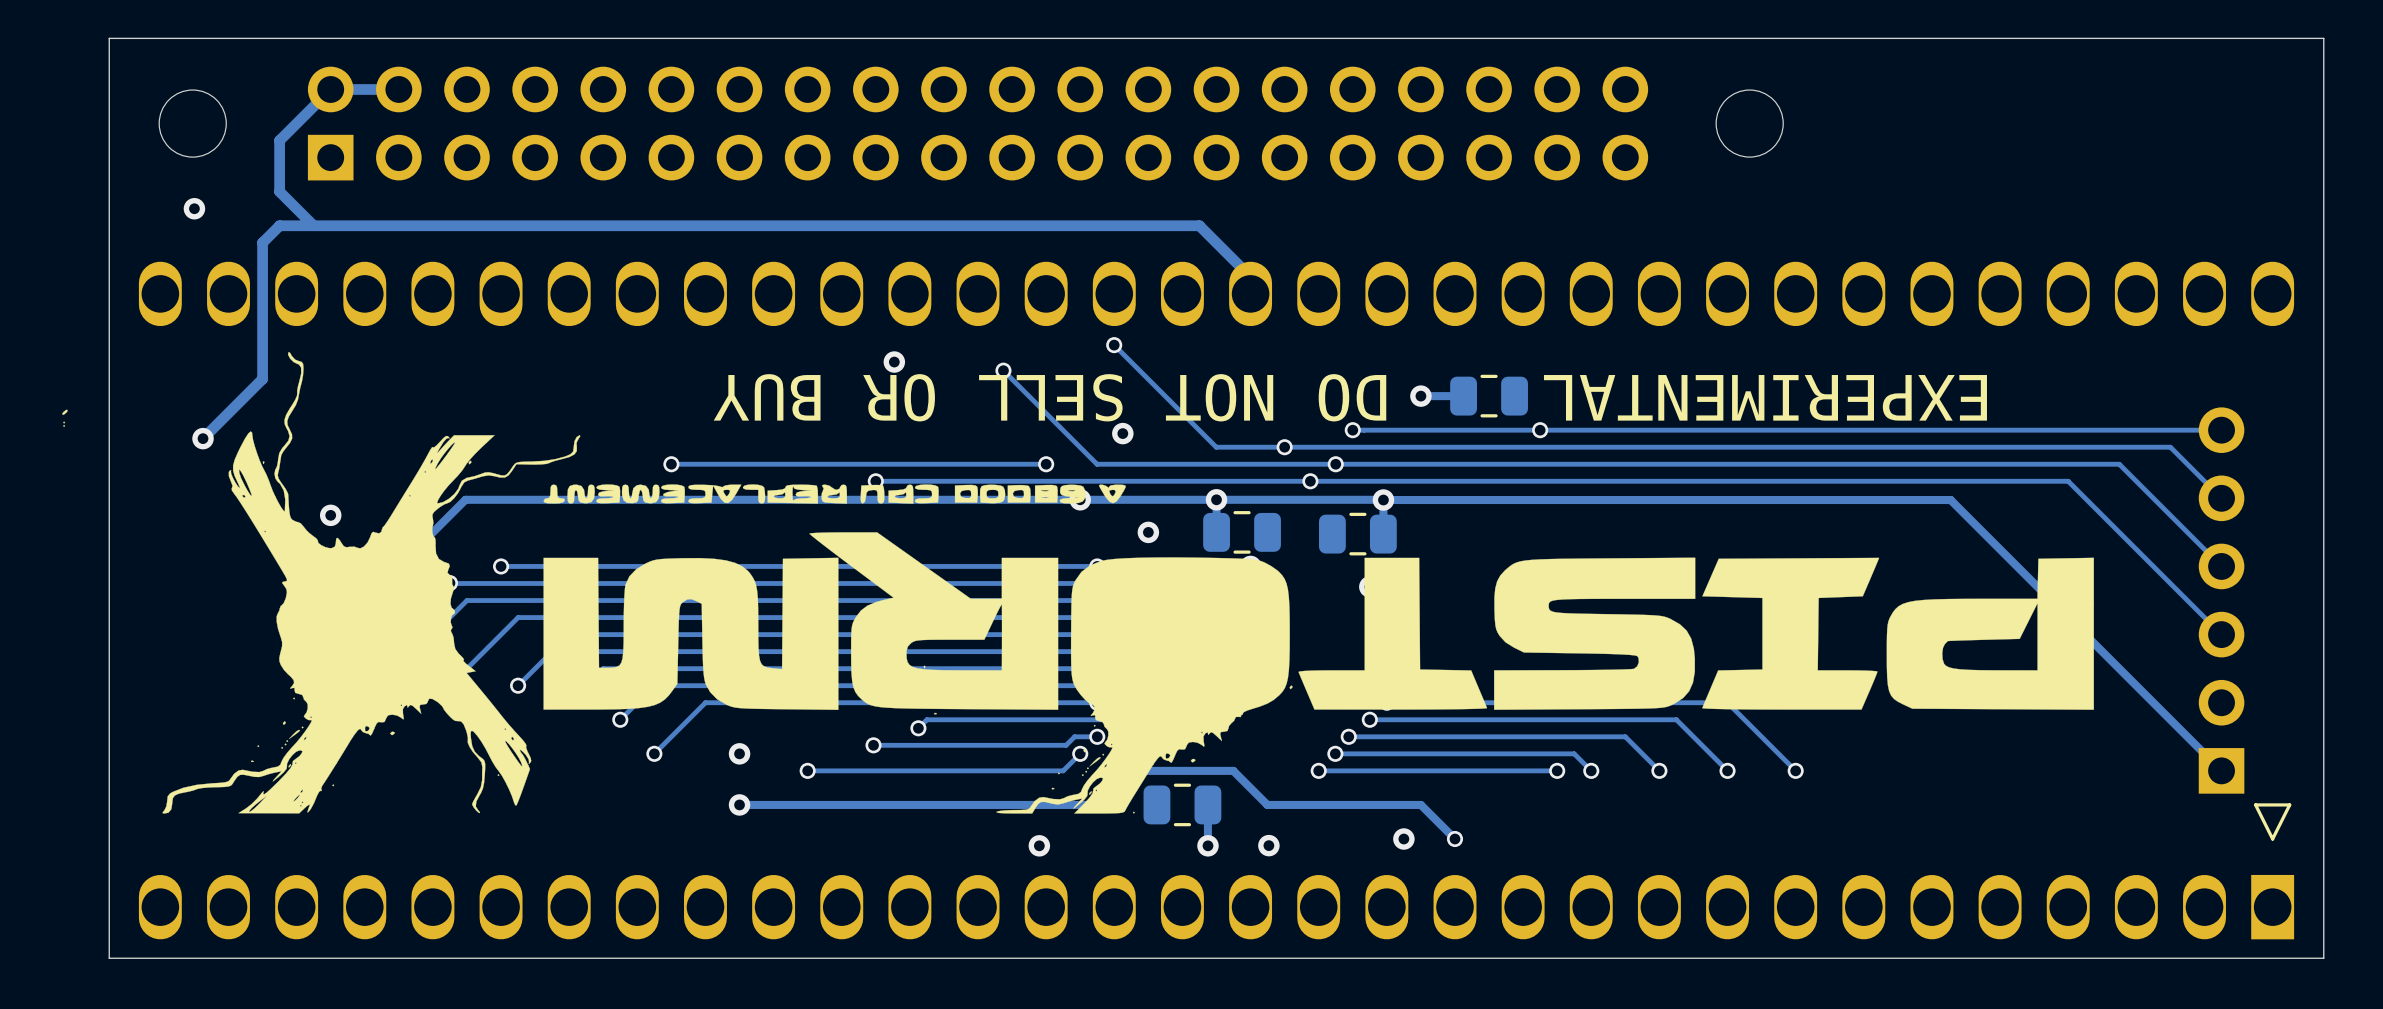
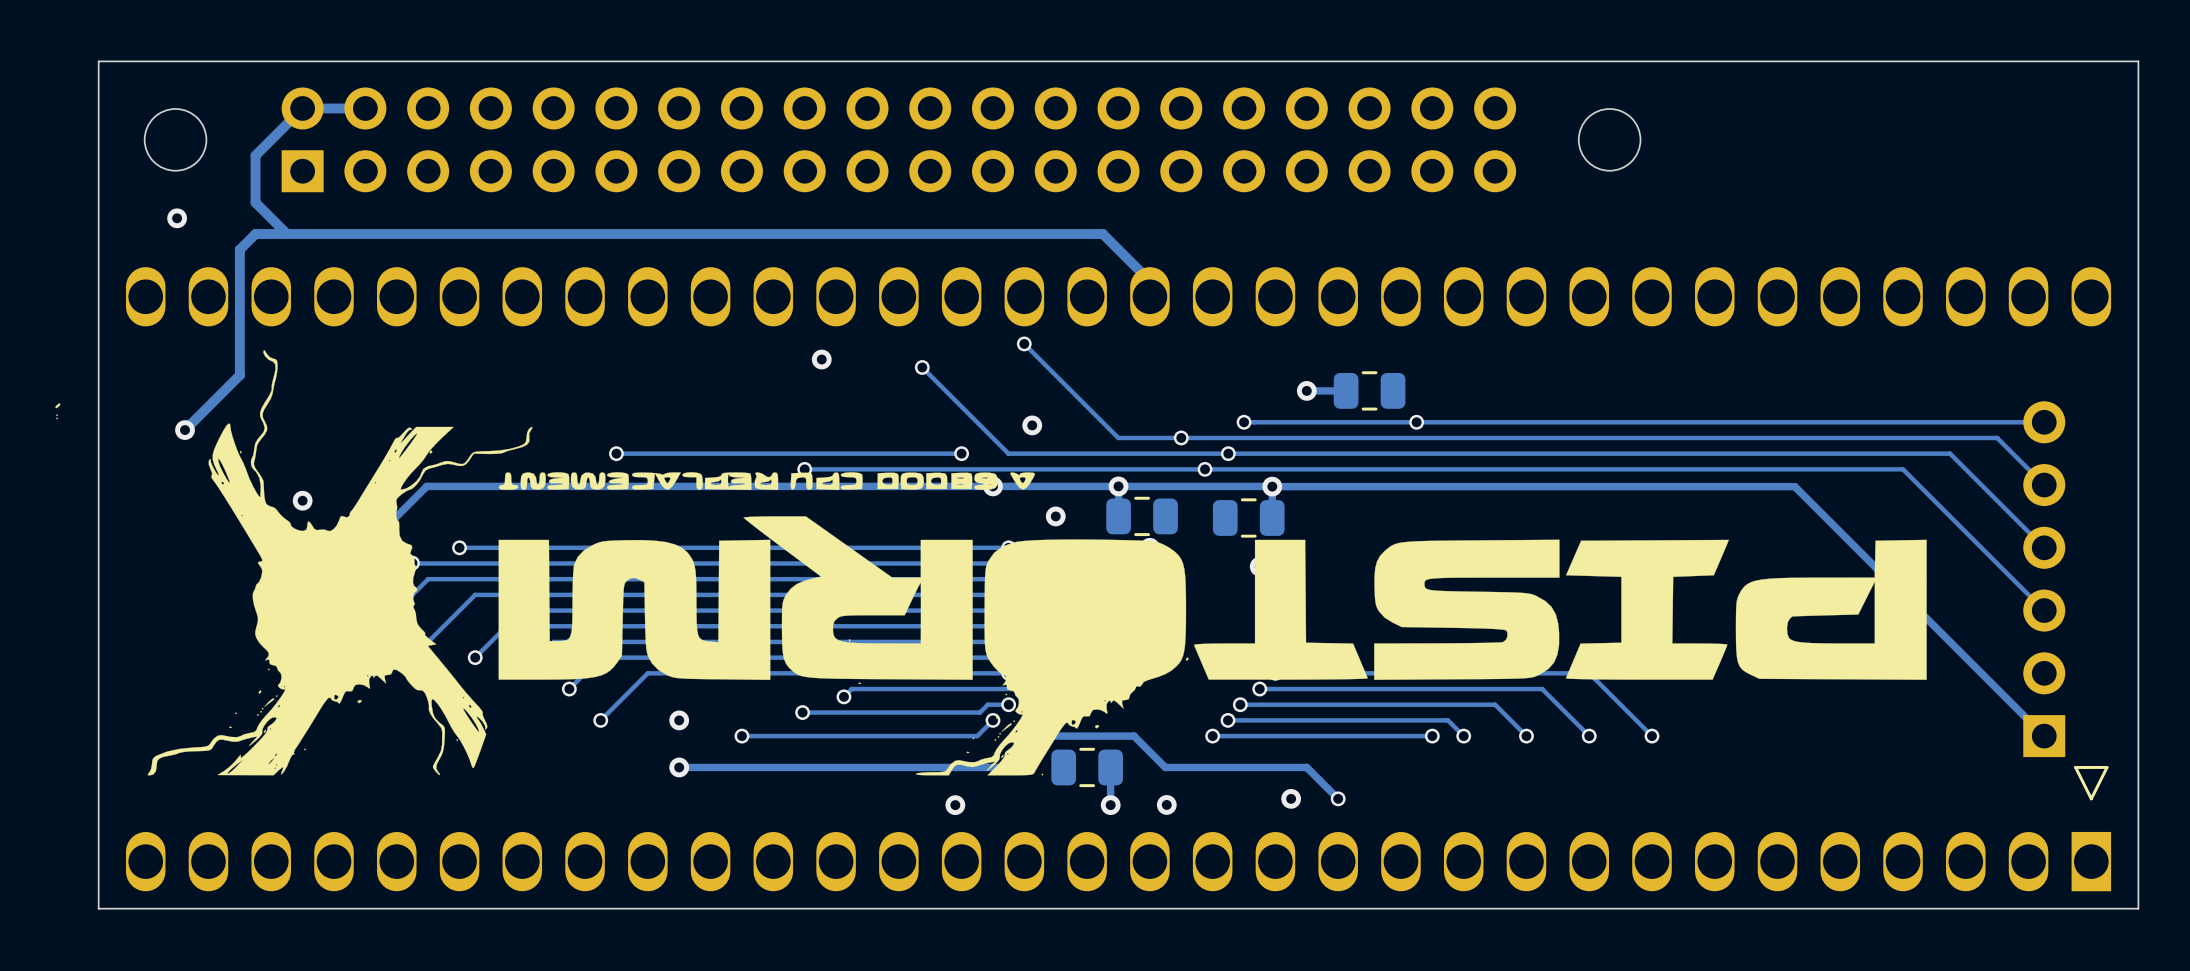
text: EXPERIMENTAL DO NOT SELL OR BUY (1350, 397) -> none

